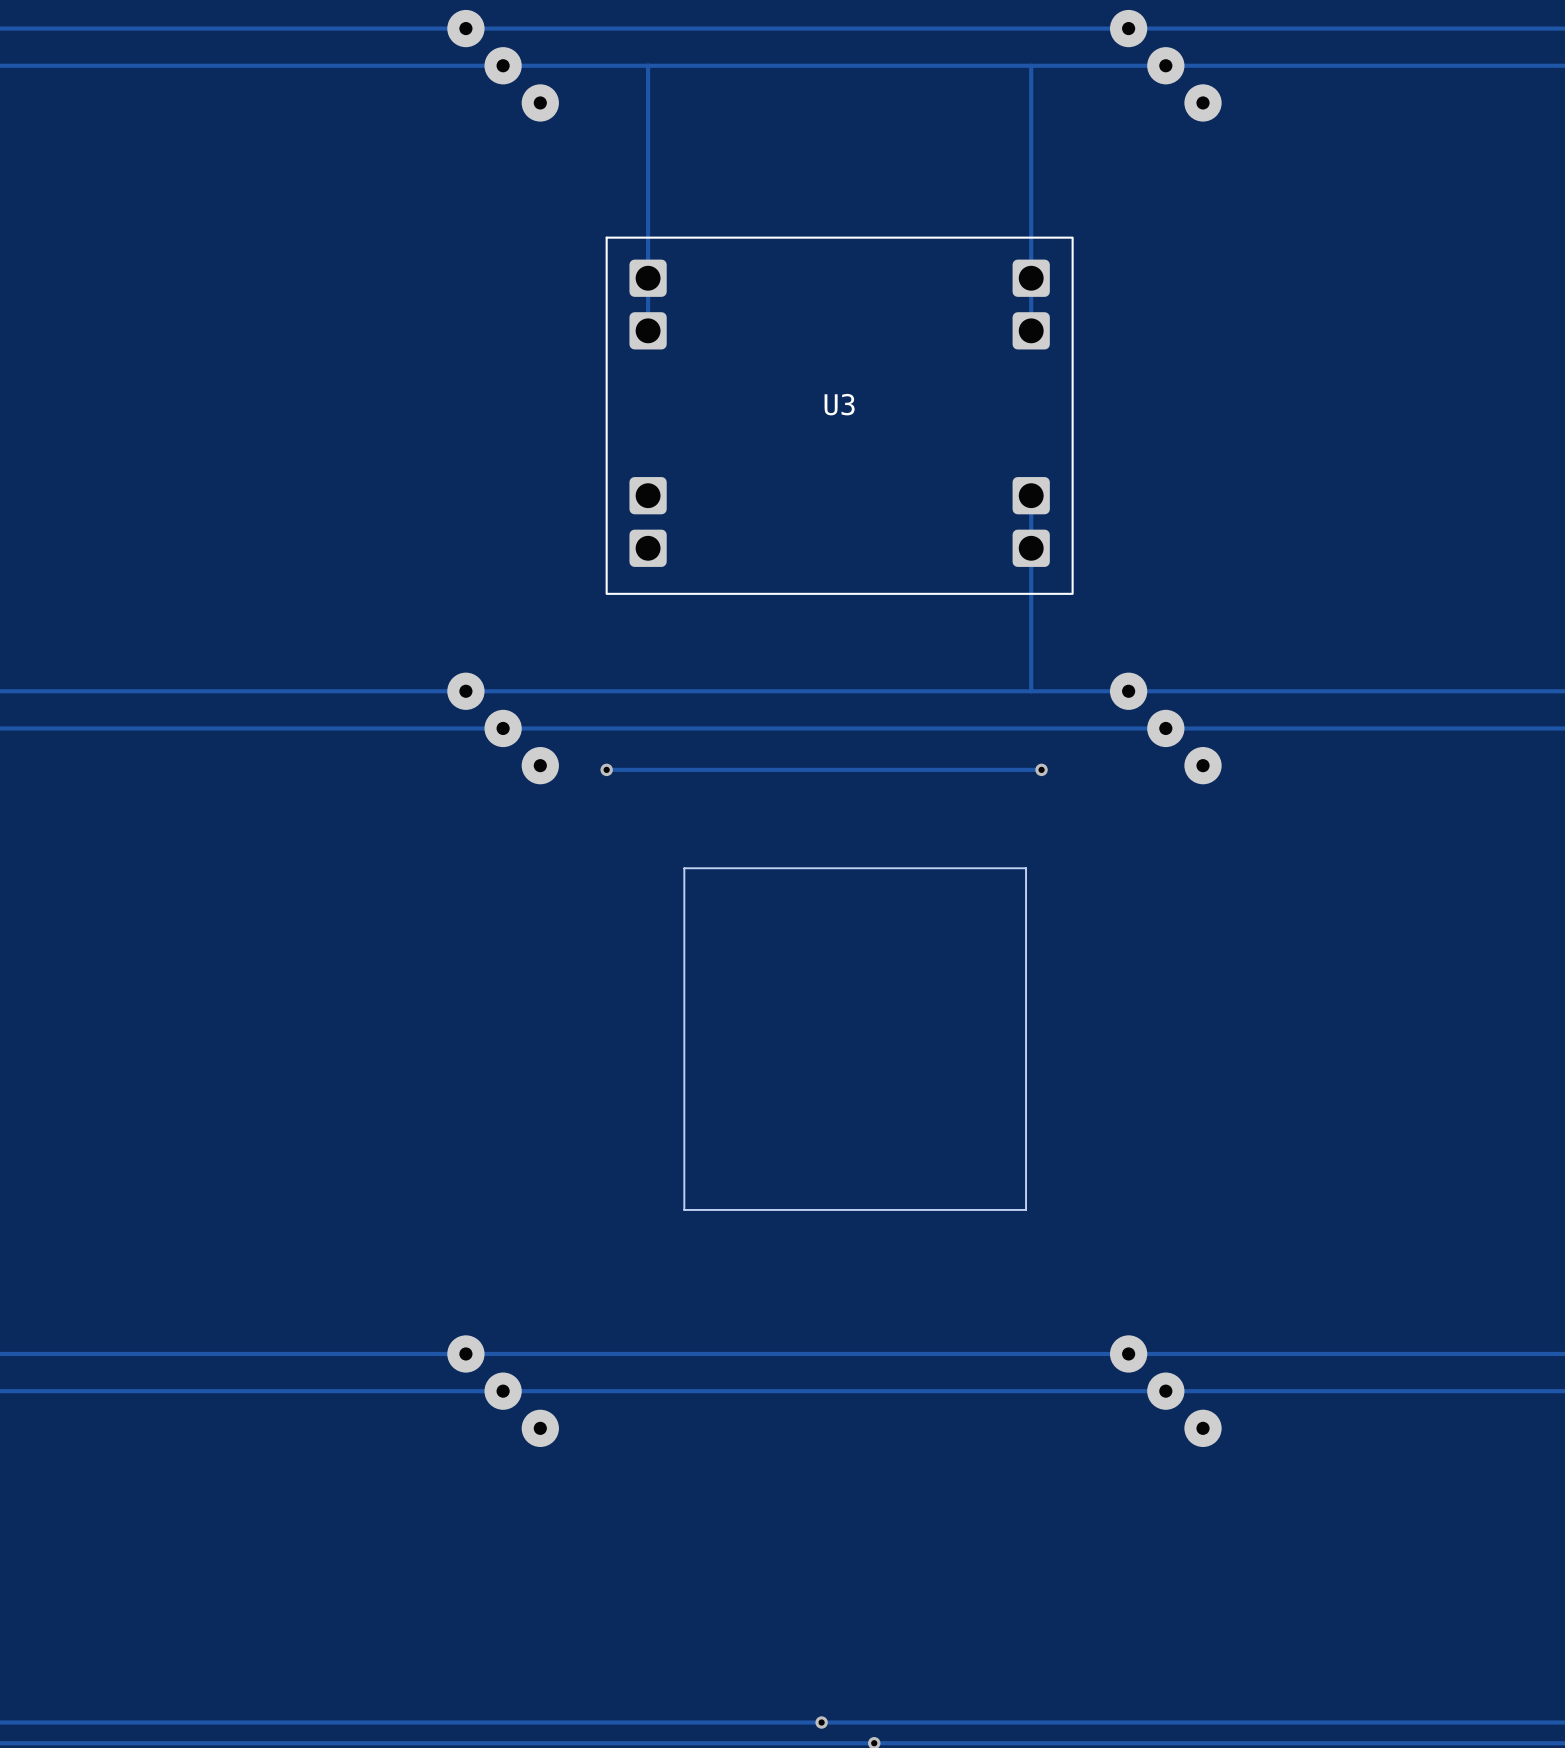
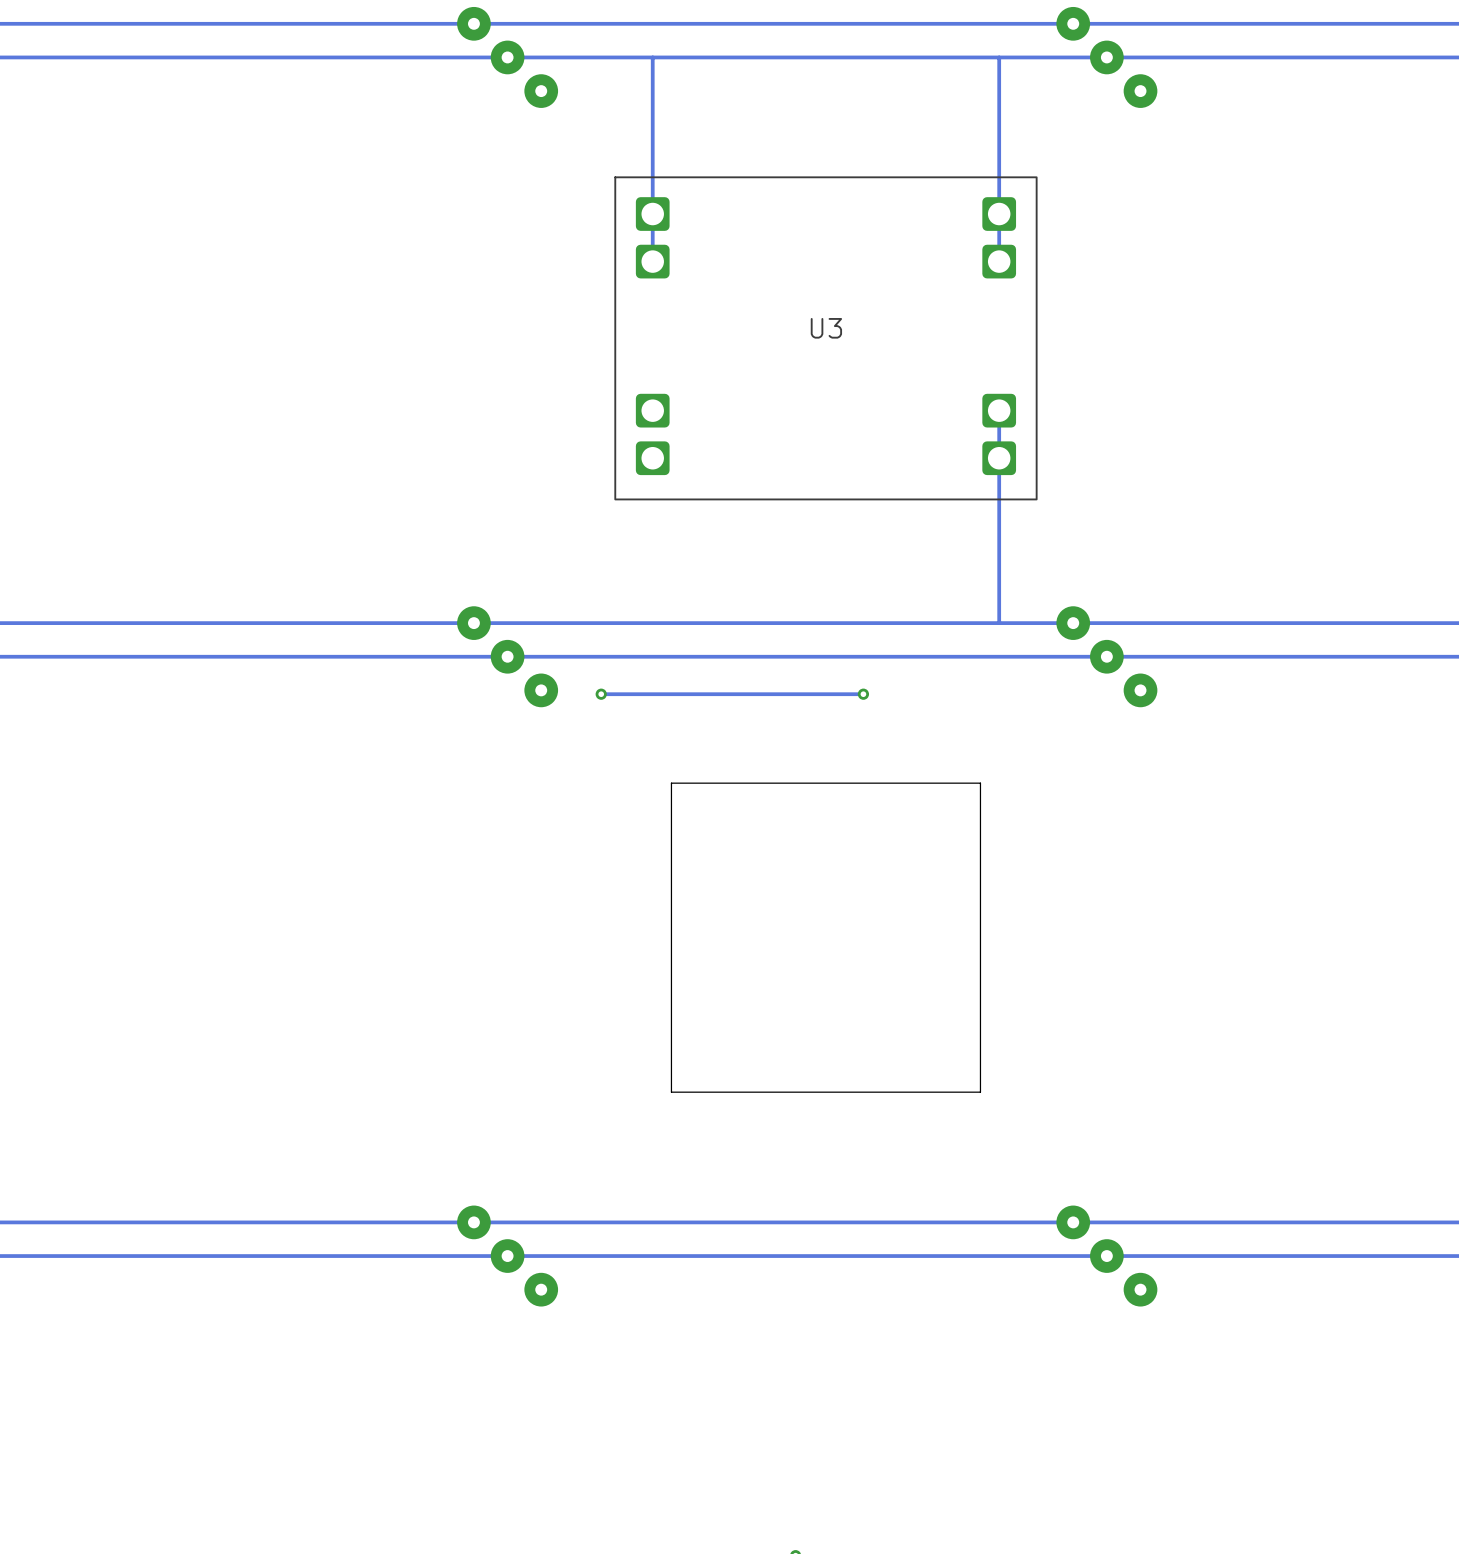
track: (648, 65) (648, 335) -> none
track: none -> (652, 57) (652, 261)
track: (1031, 65) (1031, 335) -> none
track: none -> (999, 57) (999, 261)
U3 position: (839, 415) -> (825, 338)
track: none -> (999, 410) (999, 623)
track: (1031, 495) (1031, 691) -> none
via: none -> (863, 694)
track: (1041, 769) (896, 769) -> none
via: (1041, 769) -> none

